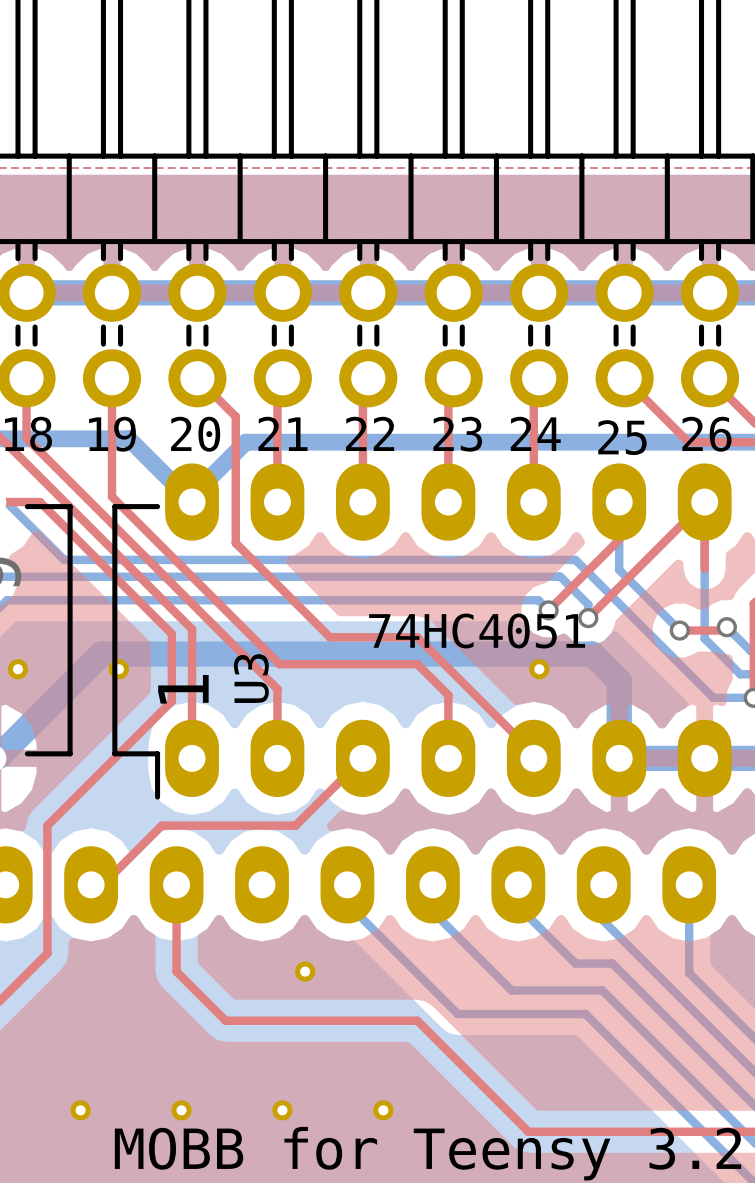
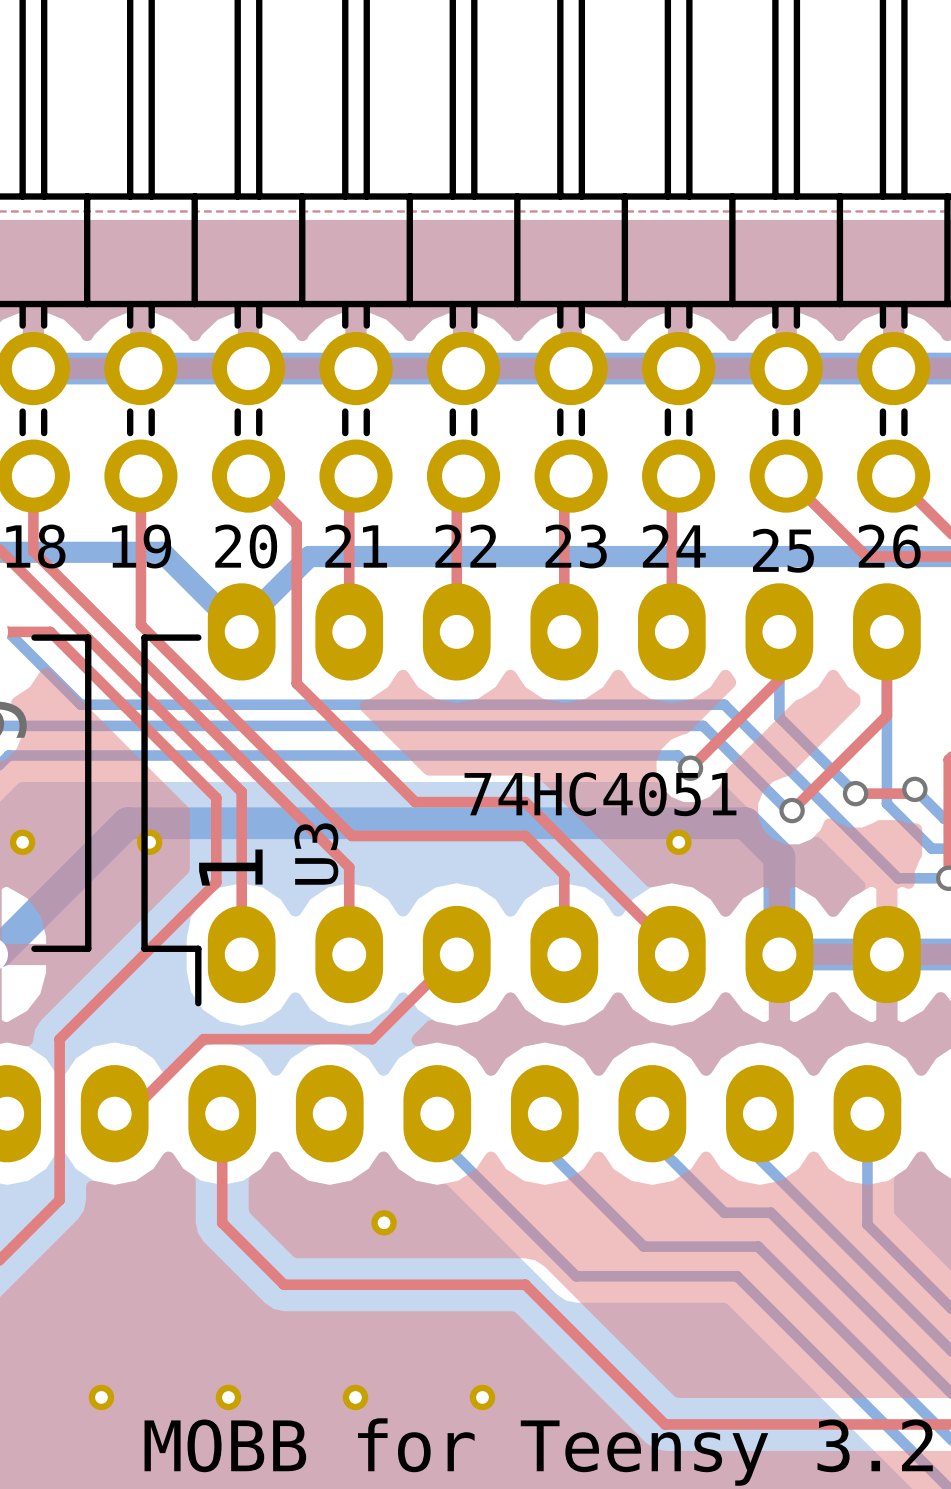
top track: (704, 502) (588, 618) -> none
top track: none -> (886, 715) (792, 810)
bottom track: (558, 576) (588, 604) (588, 618) -> (703, 725) (787, 810) (792, 810)
via position: (588, 618) -> (792, 810)

